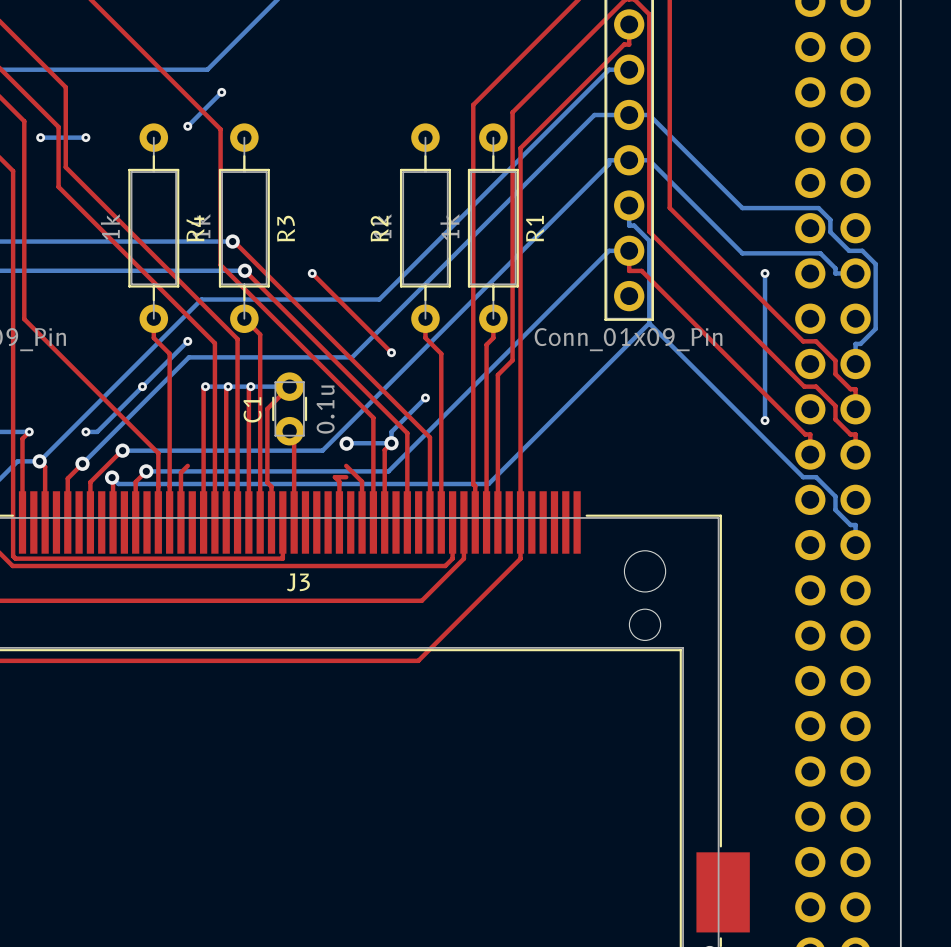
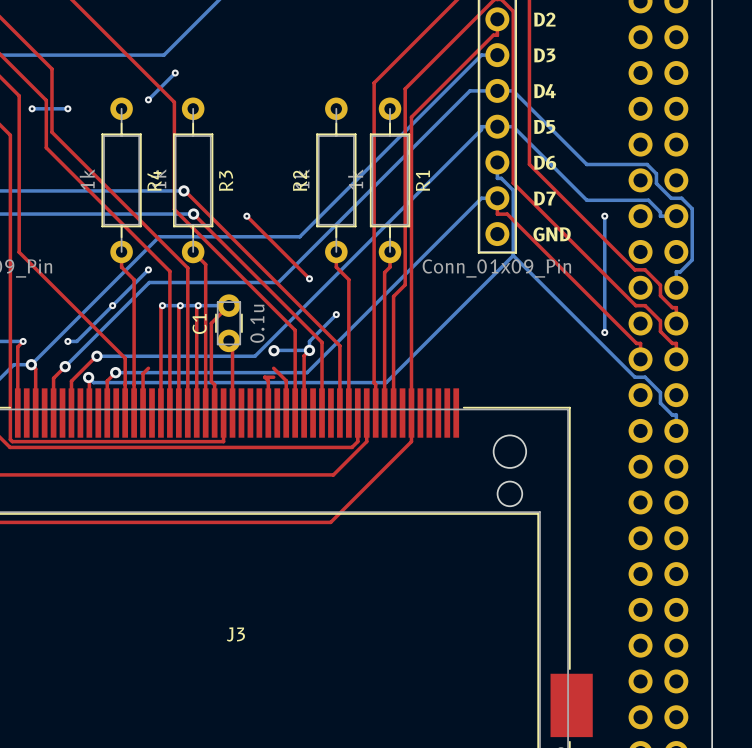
text: none -> D2 (544, 19)
text: none -> D3 (544, 55)
text: none -> D4 (544, 91)
text: none -> D5 (544, 126)
text: none -> D6 (545, 162)
text: none -> D7 (544, 198)
text: none -> GND (552, 234)
J3 name position: J3 (298, 582) -> J3 (235, 634)

